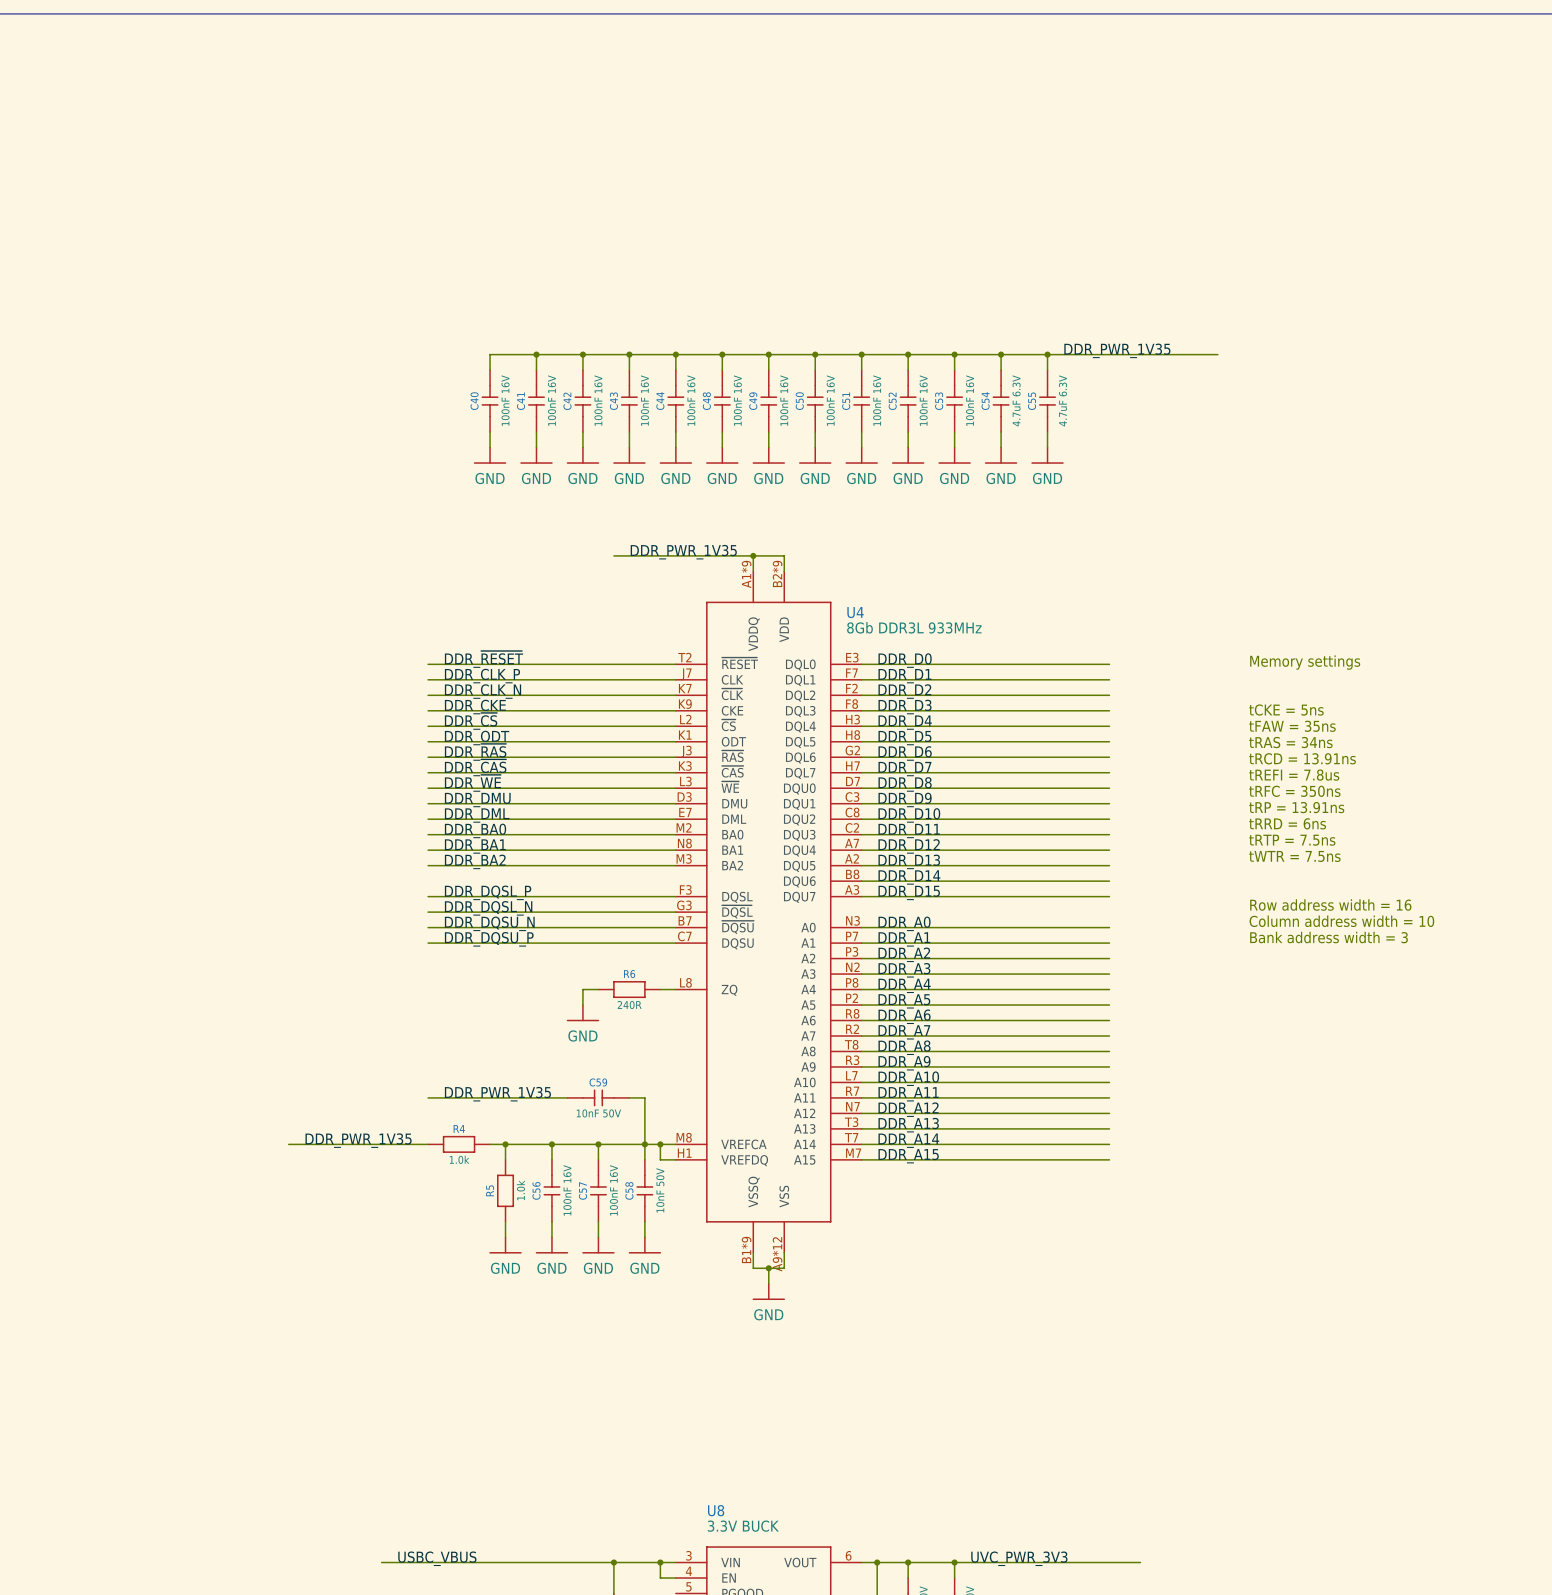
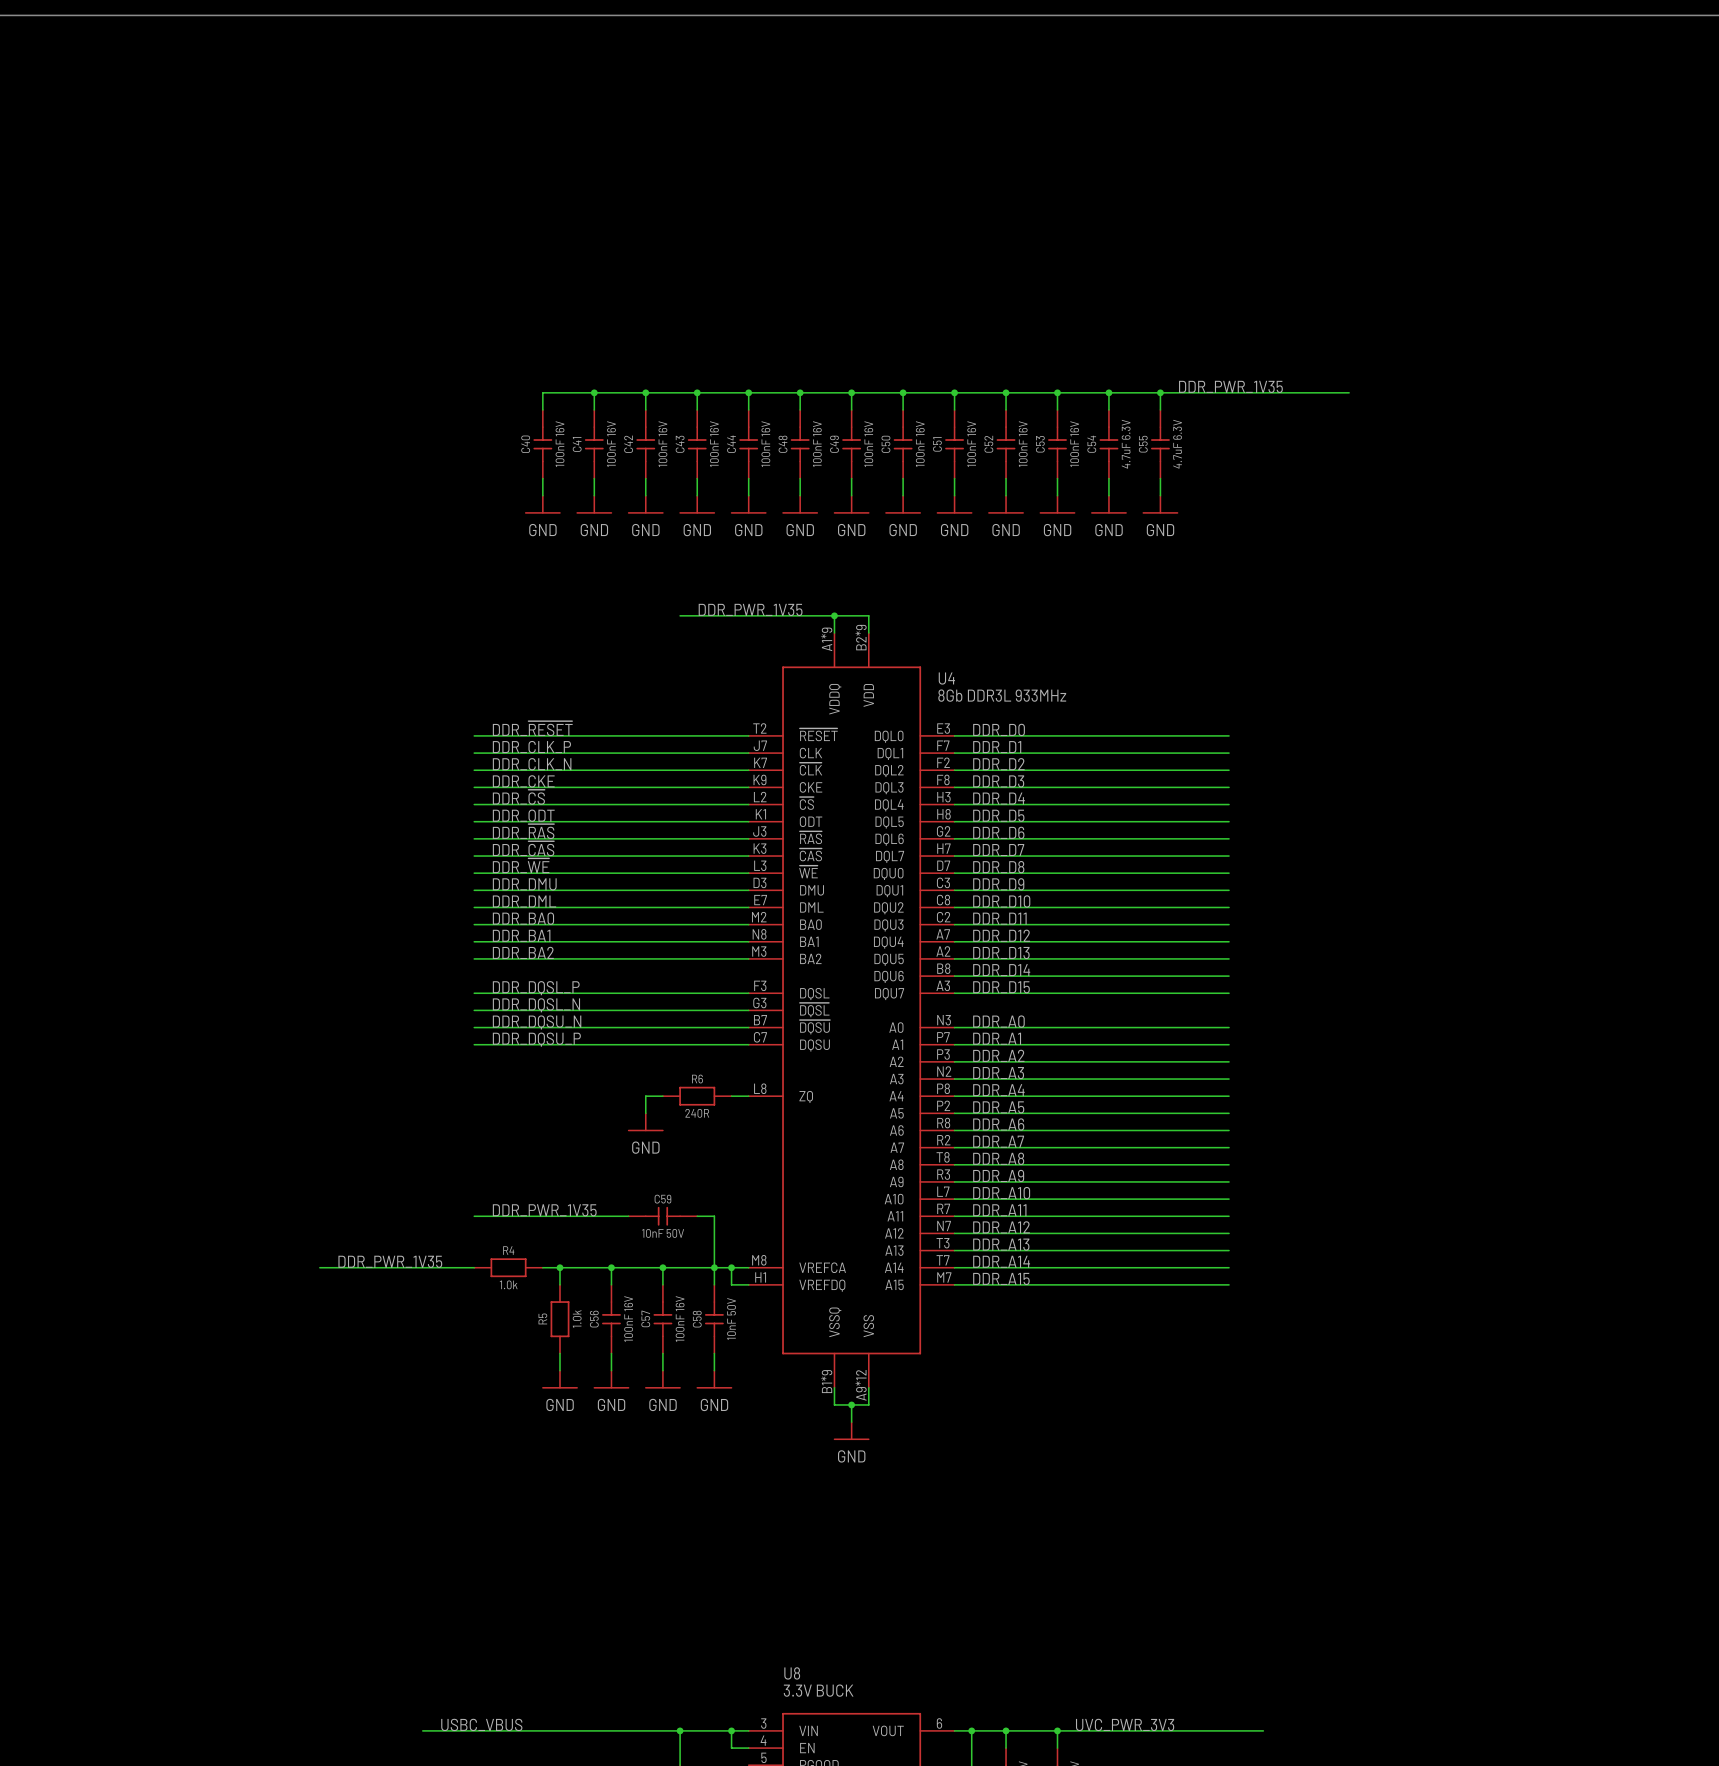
text: Memory settings (1305, 662) -> none
text: tCKE = 5ns (1286, 710) -> none
text: tFAW = 35ns (1292, 726) -> none
text: tRAS = 34ns (1290, 742) -> none
text: tRCD = 13.91ns (1302, 758) -> none
text: tREFI = 7.8us (1294, 775) -> none
text: tRFC = 350ns (1294, 791) -> none
text: tRP = 13.91ns (1296, 807) -> none
text: tRRD = 6ns (1287, 823) -> none
text: tRTP = 7.5ns (1292, 840) -> none
text: tWTR = 7.5ns (1294, 856) -> none
text: Row address width = 16 (1330, 905) -> none
text: Column address width = 10 (1341, 921) -> none
text: Bank address width = 3 (1329, 937) -> none

